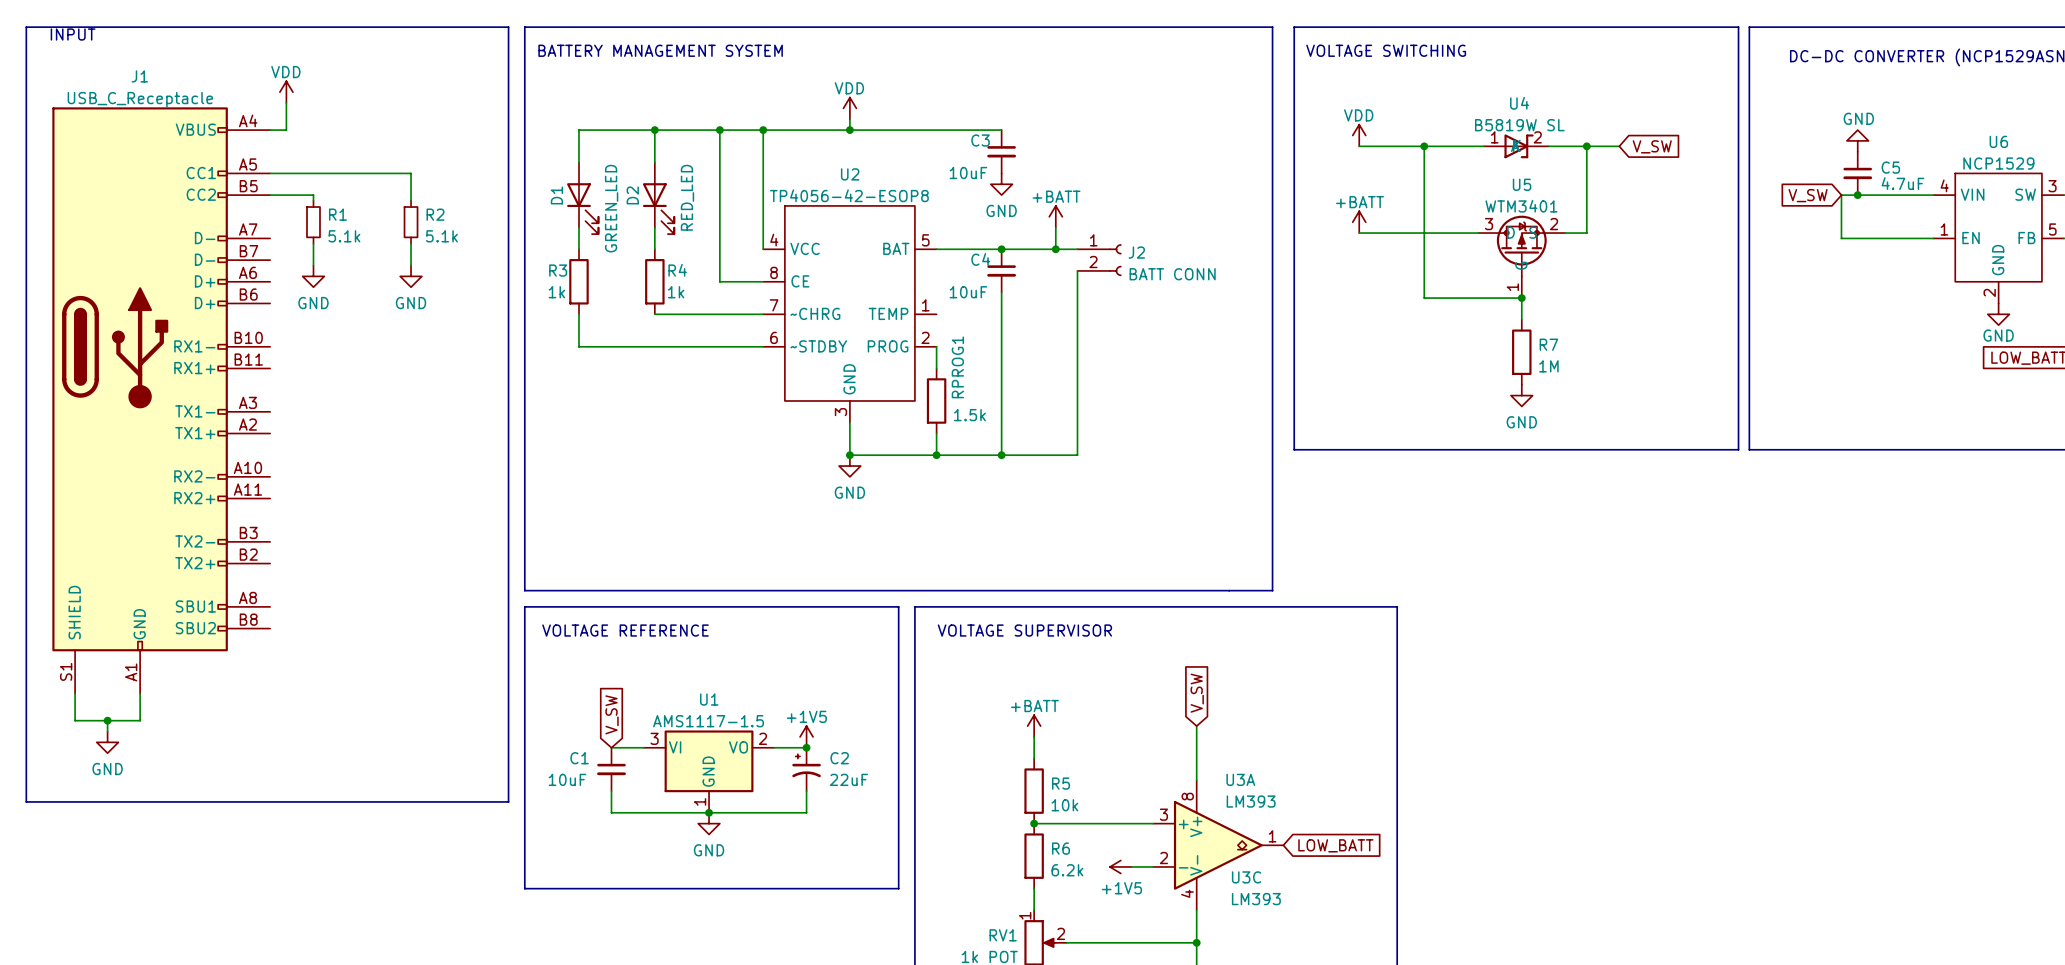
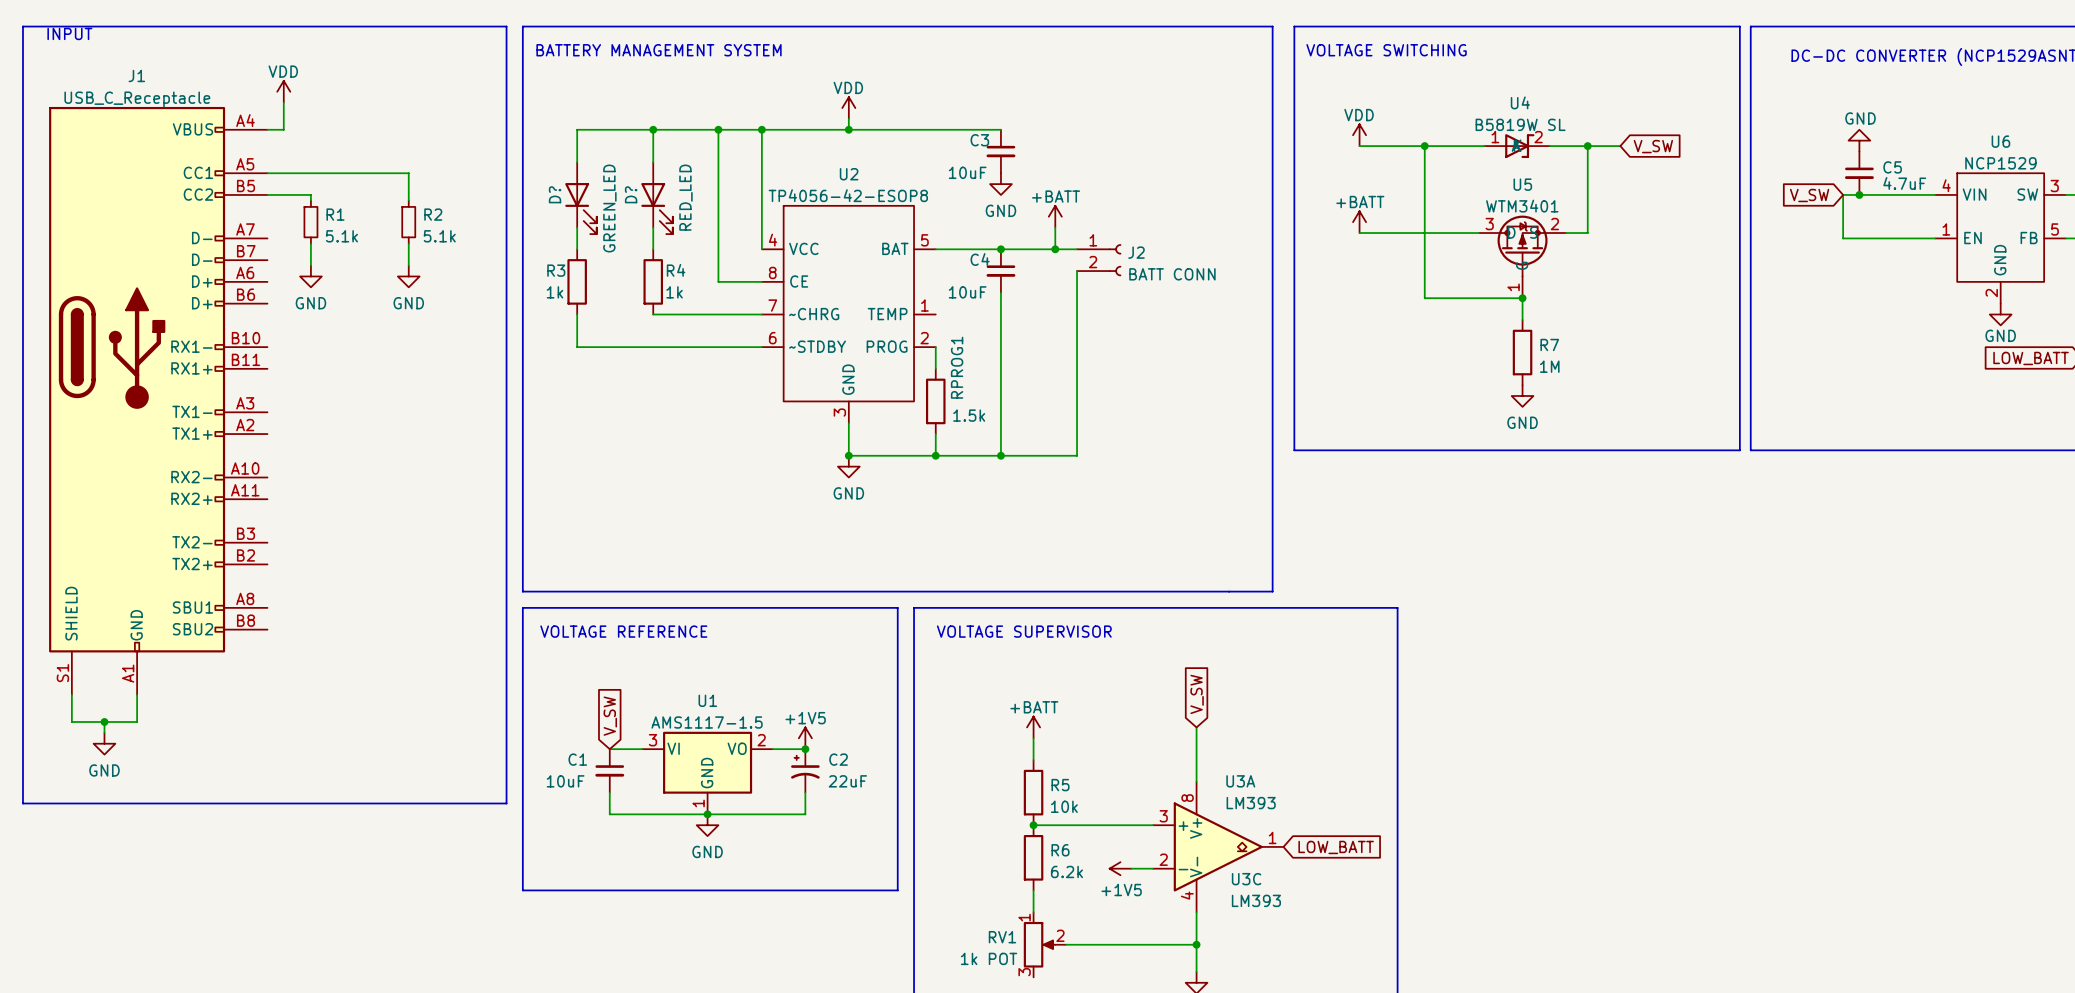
D1 name: D1 (556, 195) -> D? (555, 194)
D2 name: D2 (632, 195) -> D? (631, 194)

